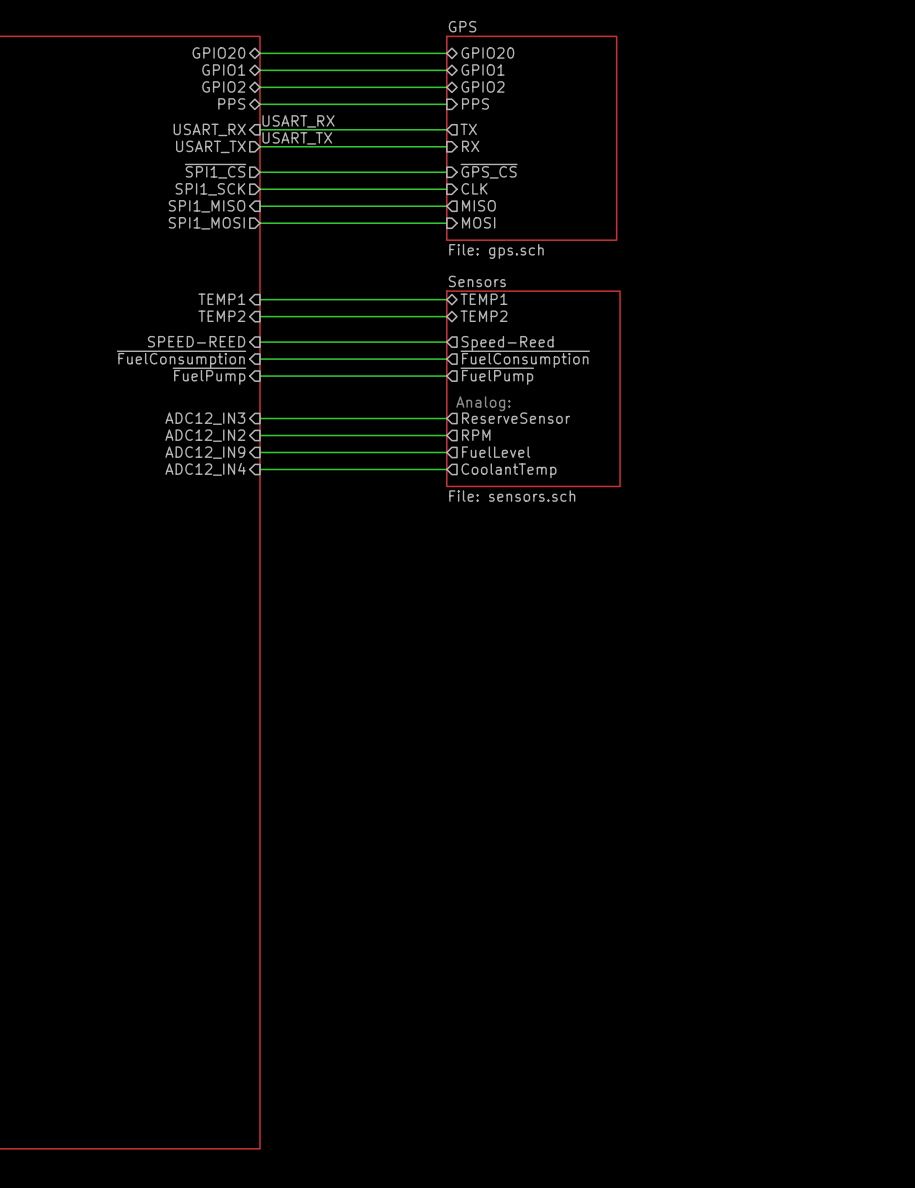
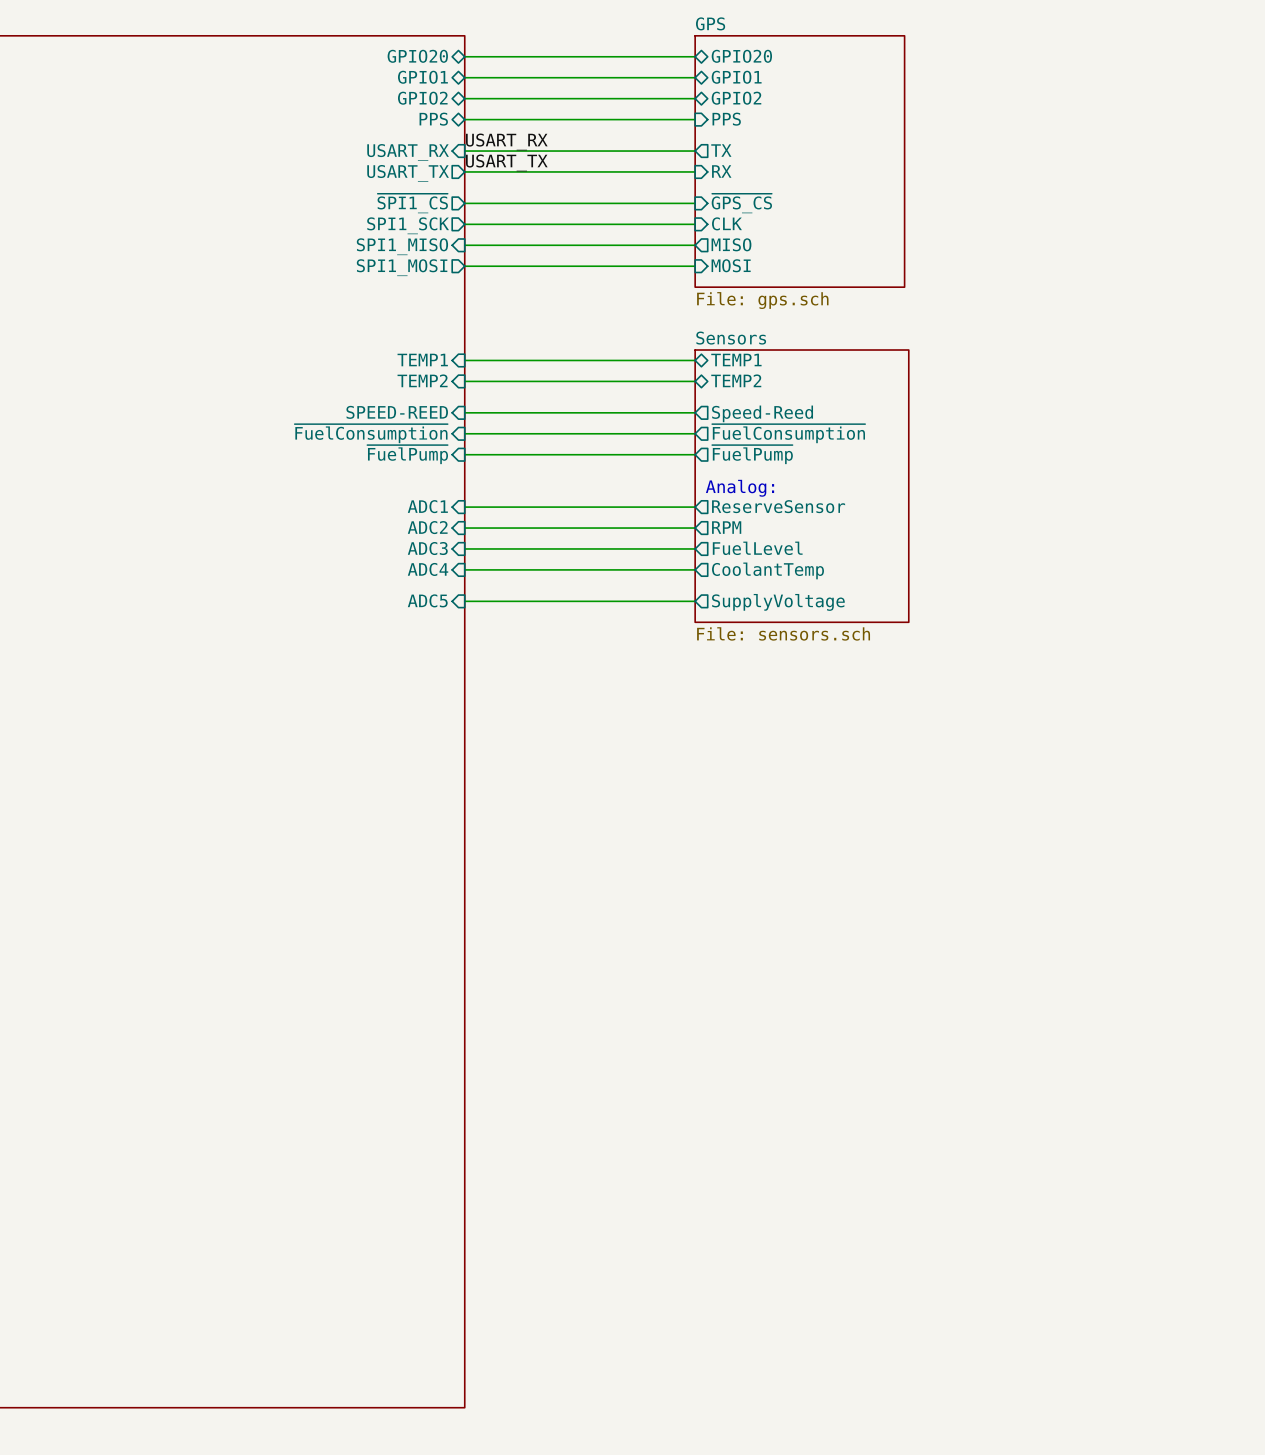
sheet Sensors: File: sensors.sch (533, 388) -> none
sheet Sensors: none -> File: sensors.sch (801, 486)
sheet pin: ADC12_IN3 (205, 418) -> ADC1 (427, 506)
sheet pin: ADC12_IN2 (205, 435) -> ADC2 (427, 527)
sheet pin: ADC12_IN9 (205, 452) -> ADC3 (427, 548)
sheet pin: ADC12_IN4 (205, 469) -> ADC4 (428, 569)
sheet pin: none -> ADC5 (427, 600)
wire: none -> (464, 601) (695, 601)
sheet pin: none -> SupplyVoltage (778, 602)

